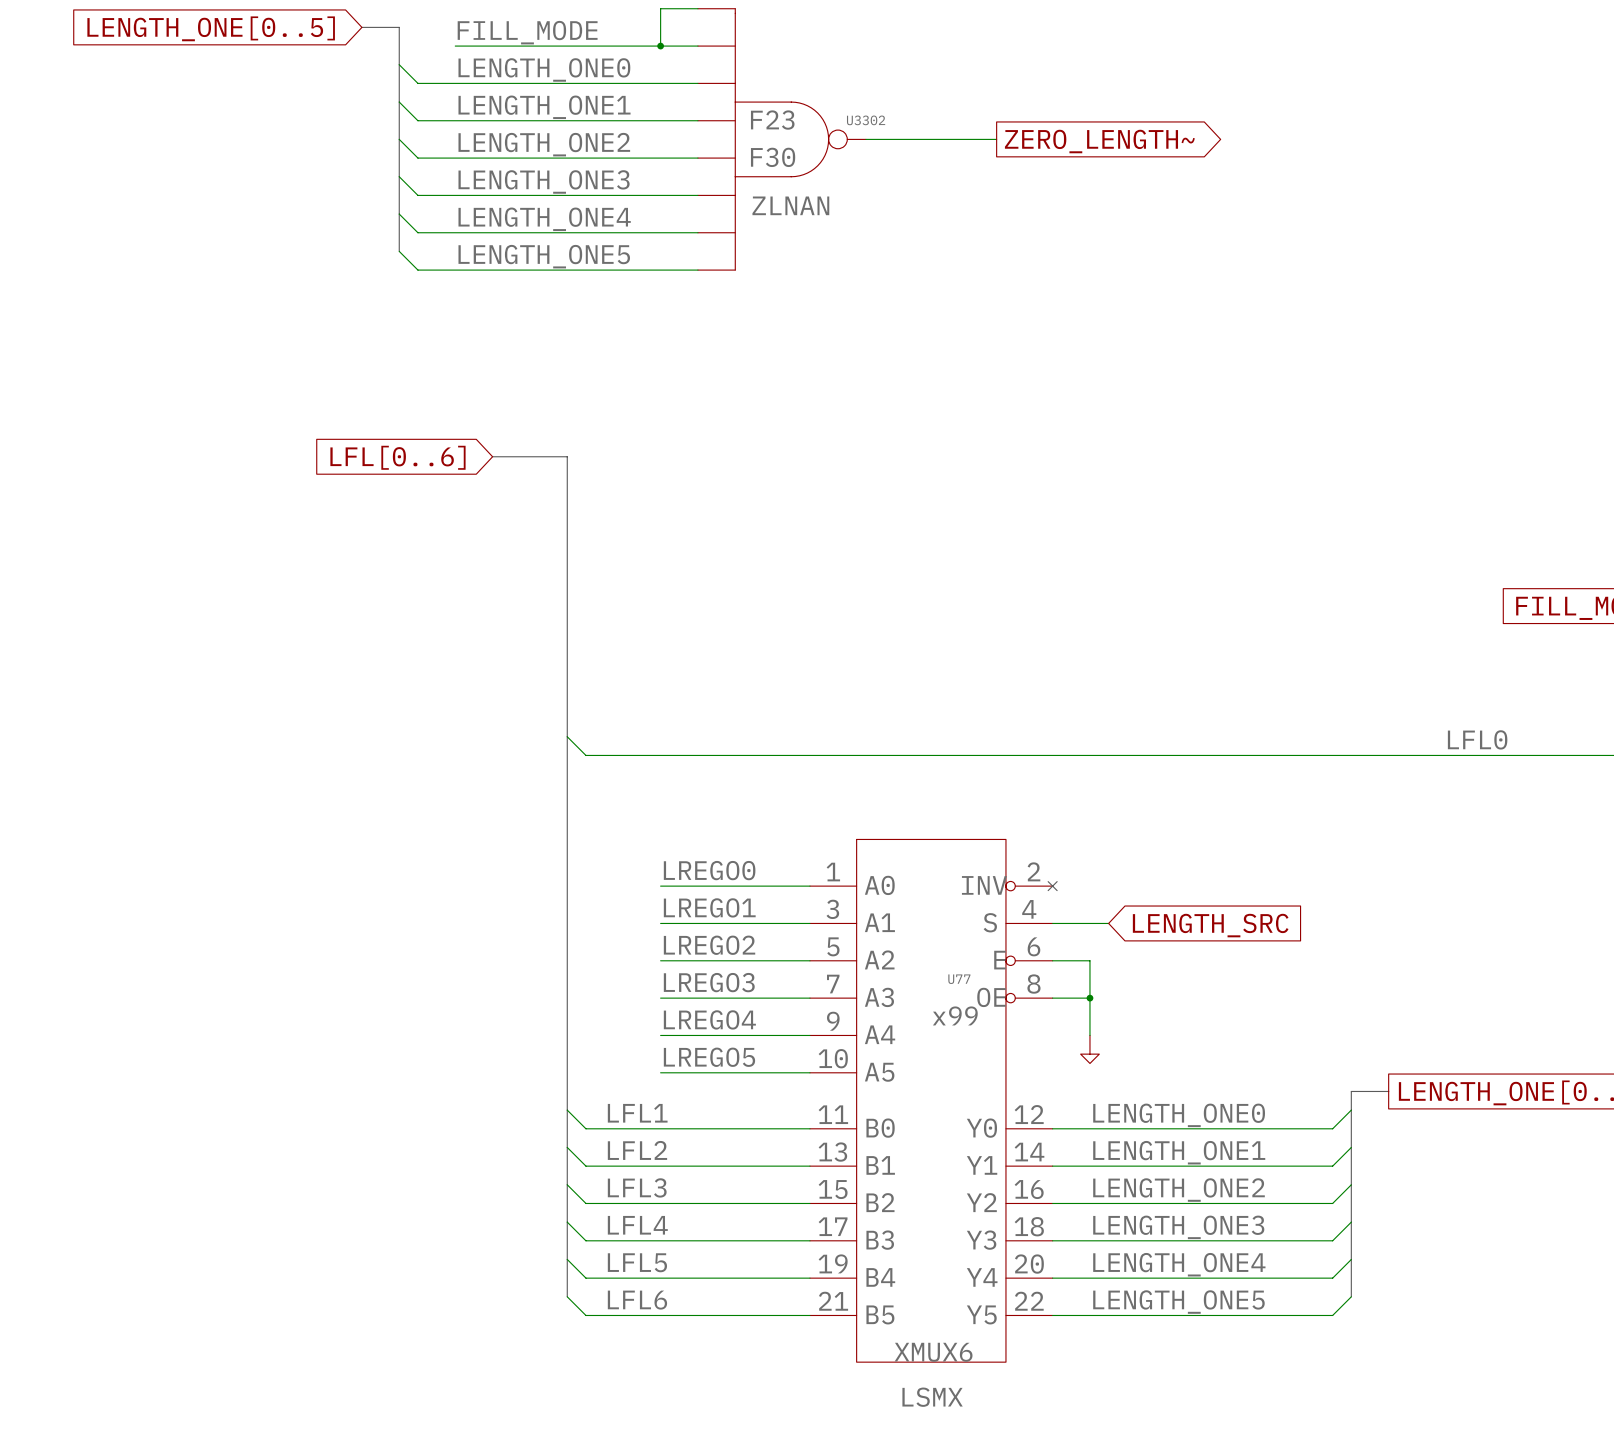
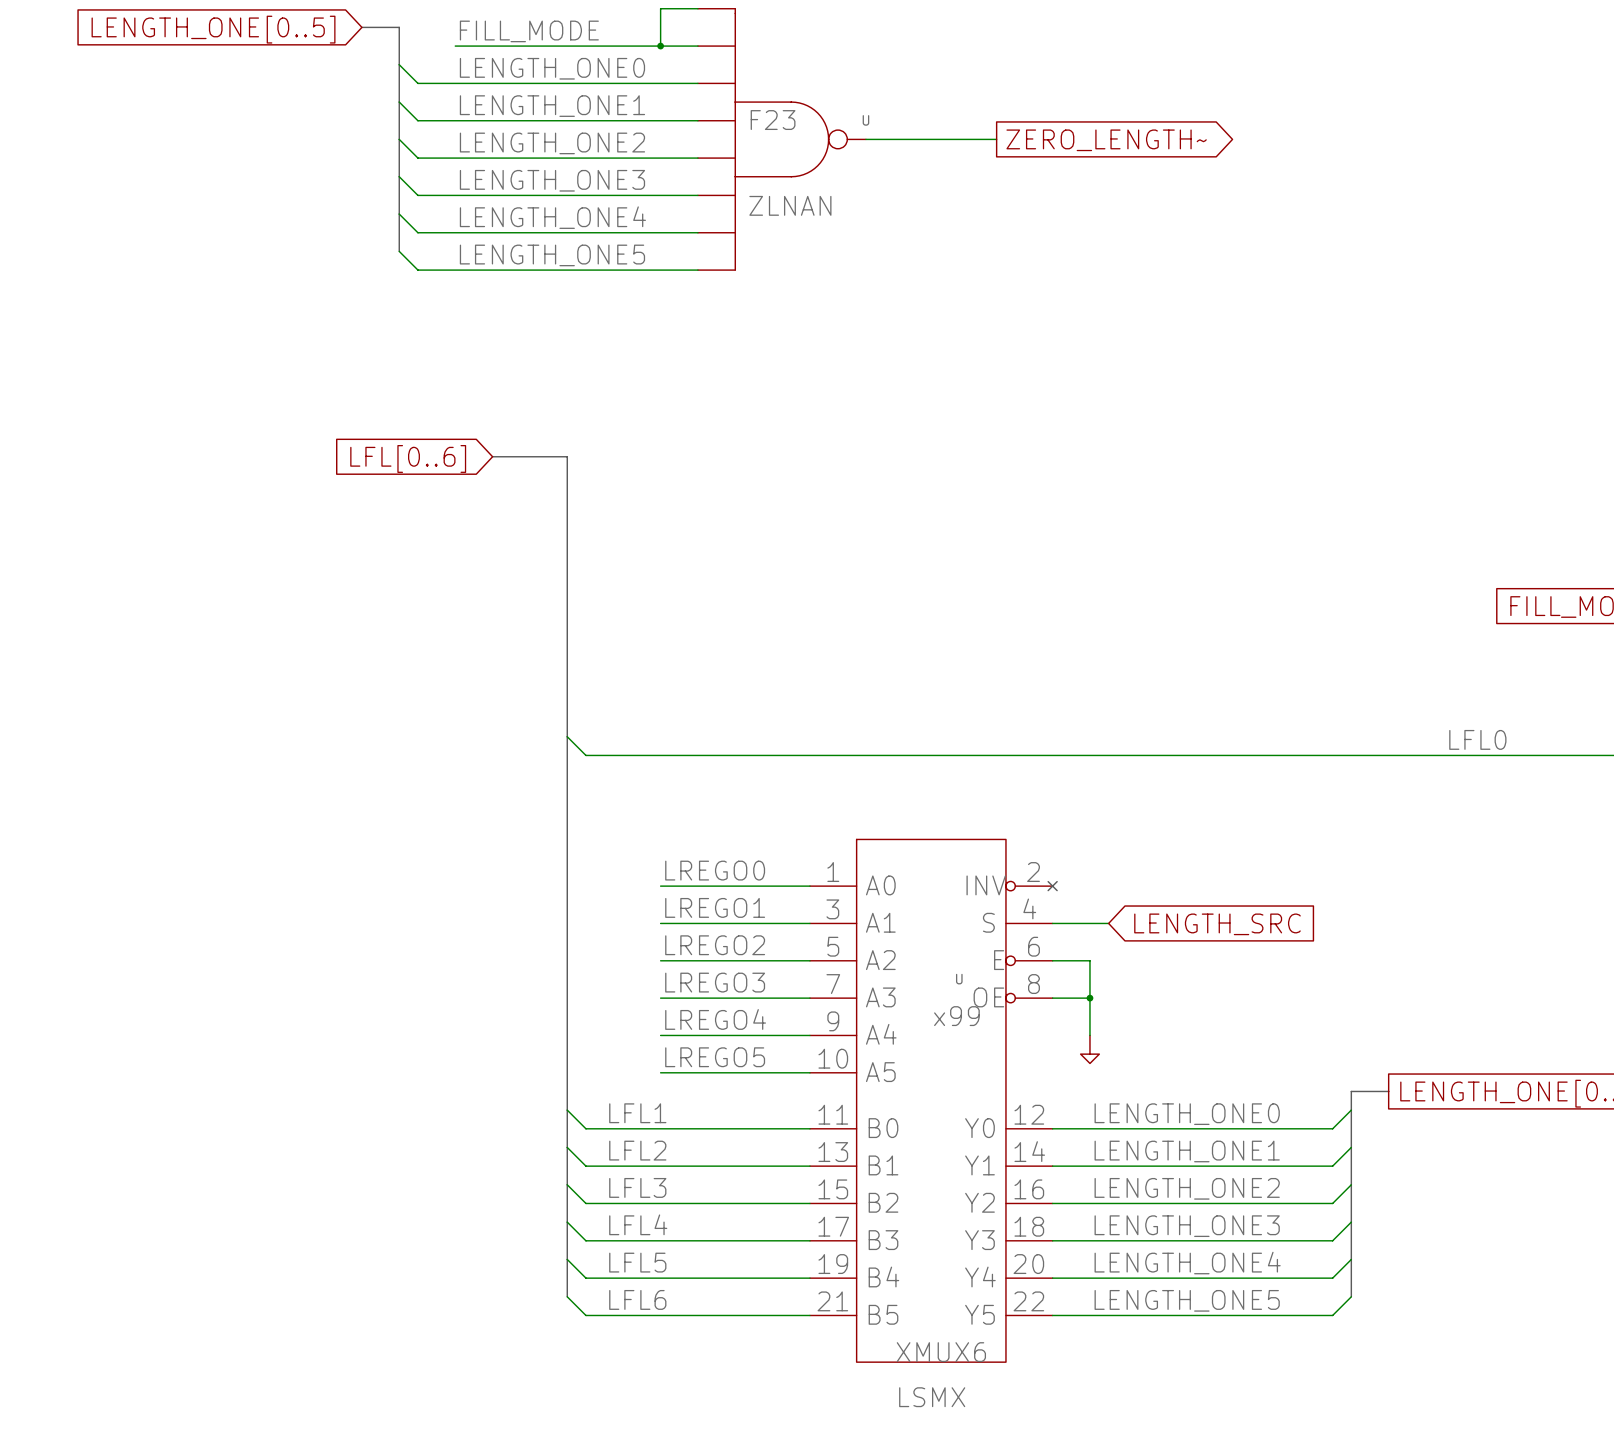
U3302 name: U3302 (866, 120) -> U (865, 120)
U3302 value: F30 (773, 157) -> none
U77 name: U77 (959, 979) -> U (959, 979)

